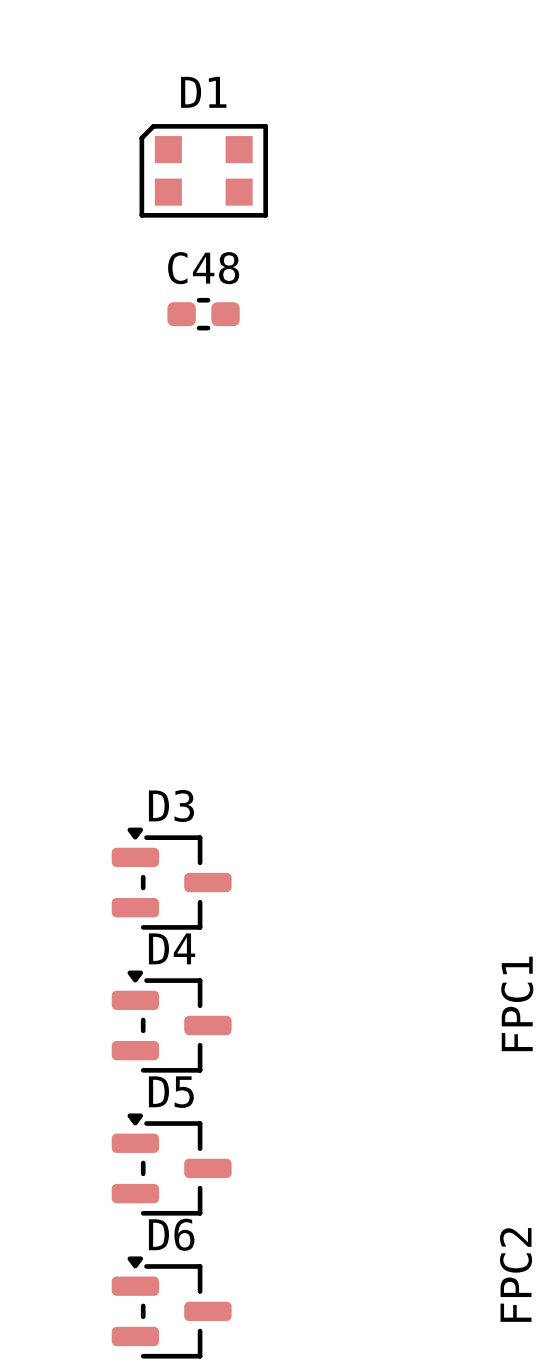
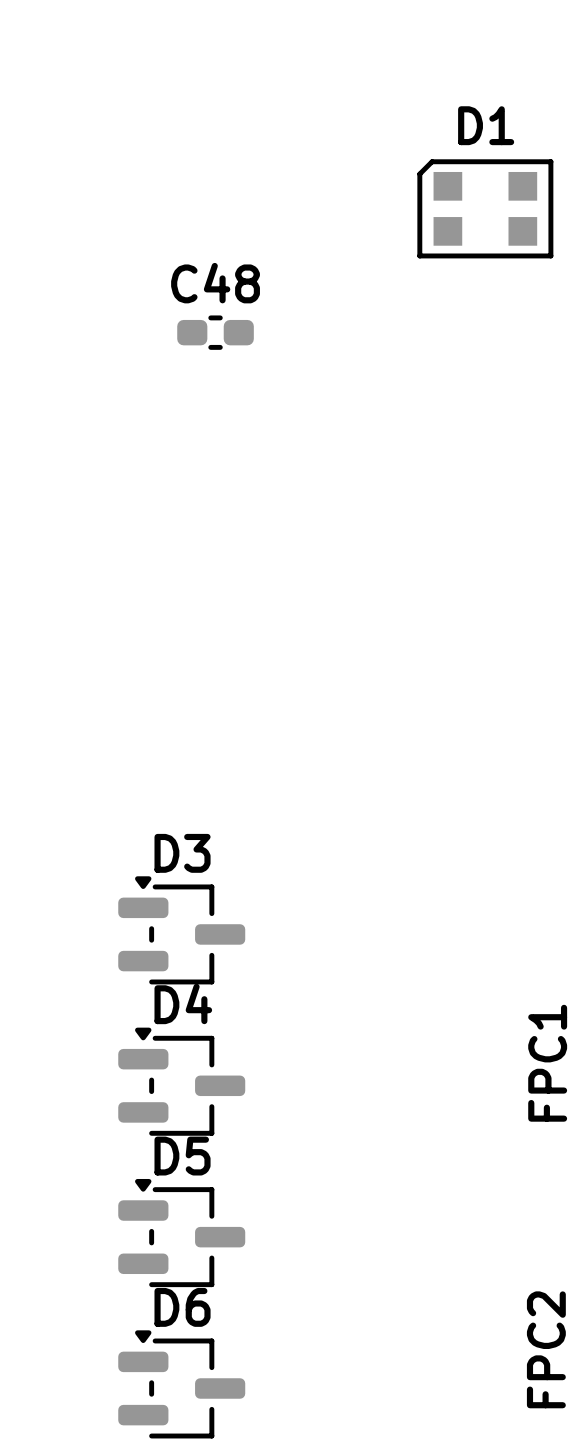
D1 position: (203, 170) -> (485, 208)

